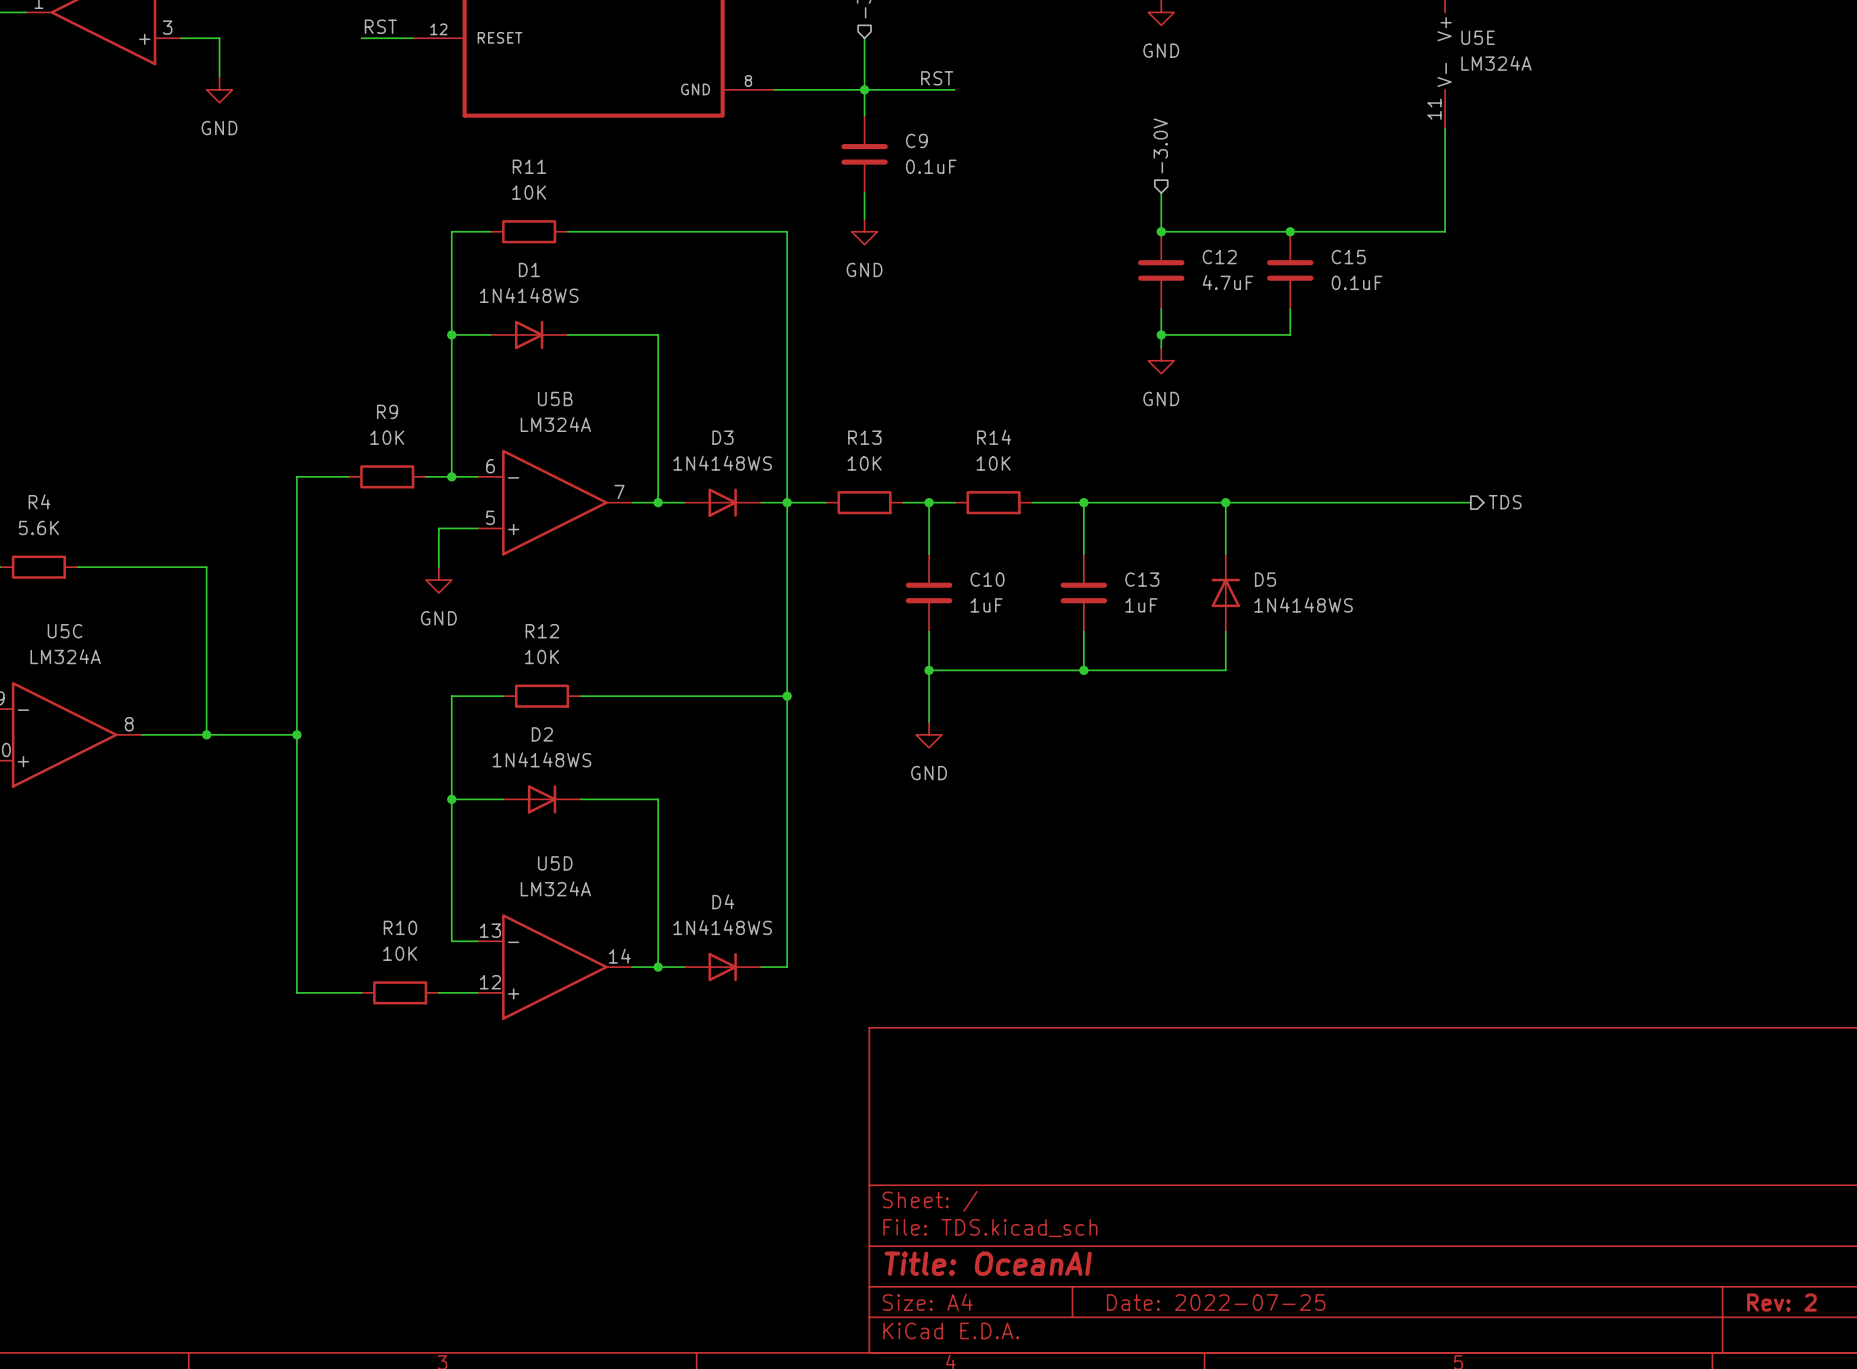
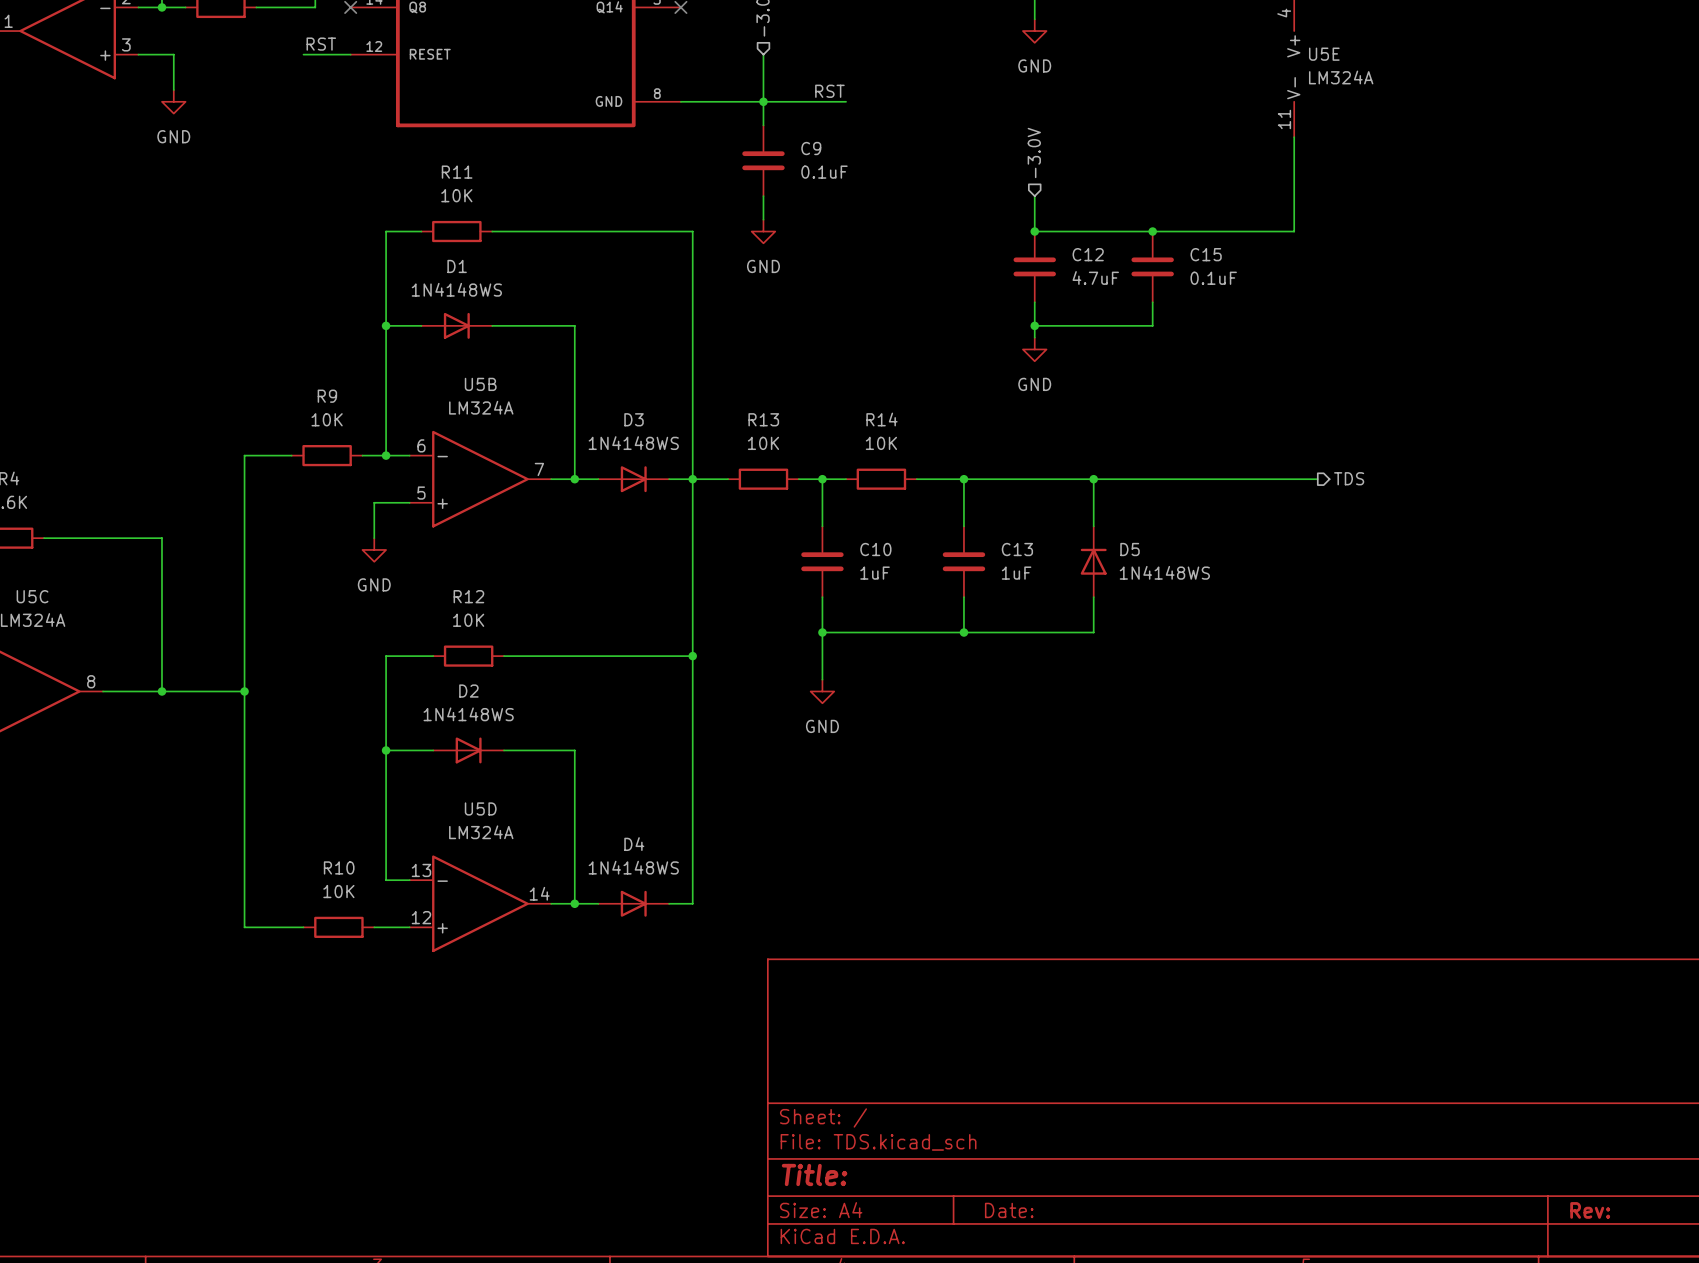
title block: Title: OceanAI (988, 1263) -> Title: (814, 1174)
title block: Date: 2022-07-25 (1216, 1302) -> Date: (1009, 1210)
title block: Rev: 2 (1781, 1302) -> Rev: (1590, 1210)

